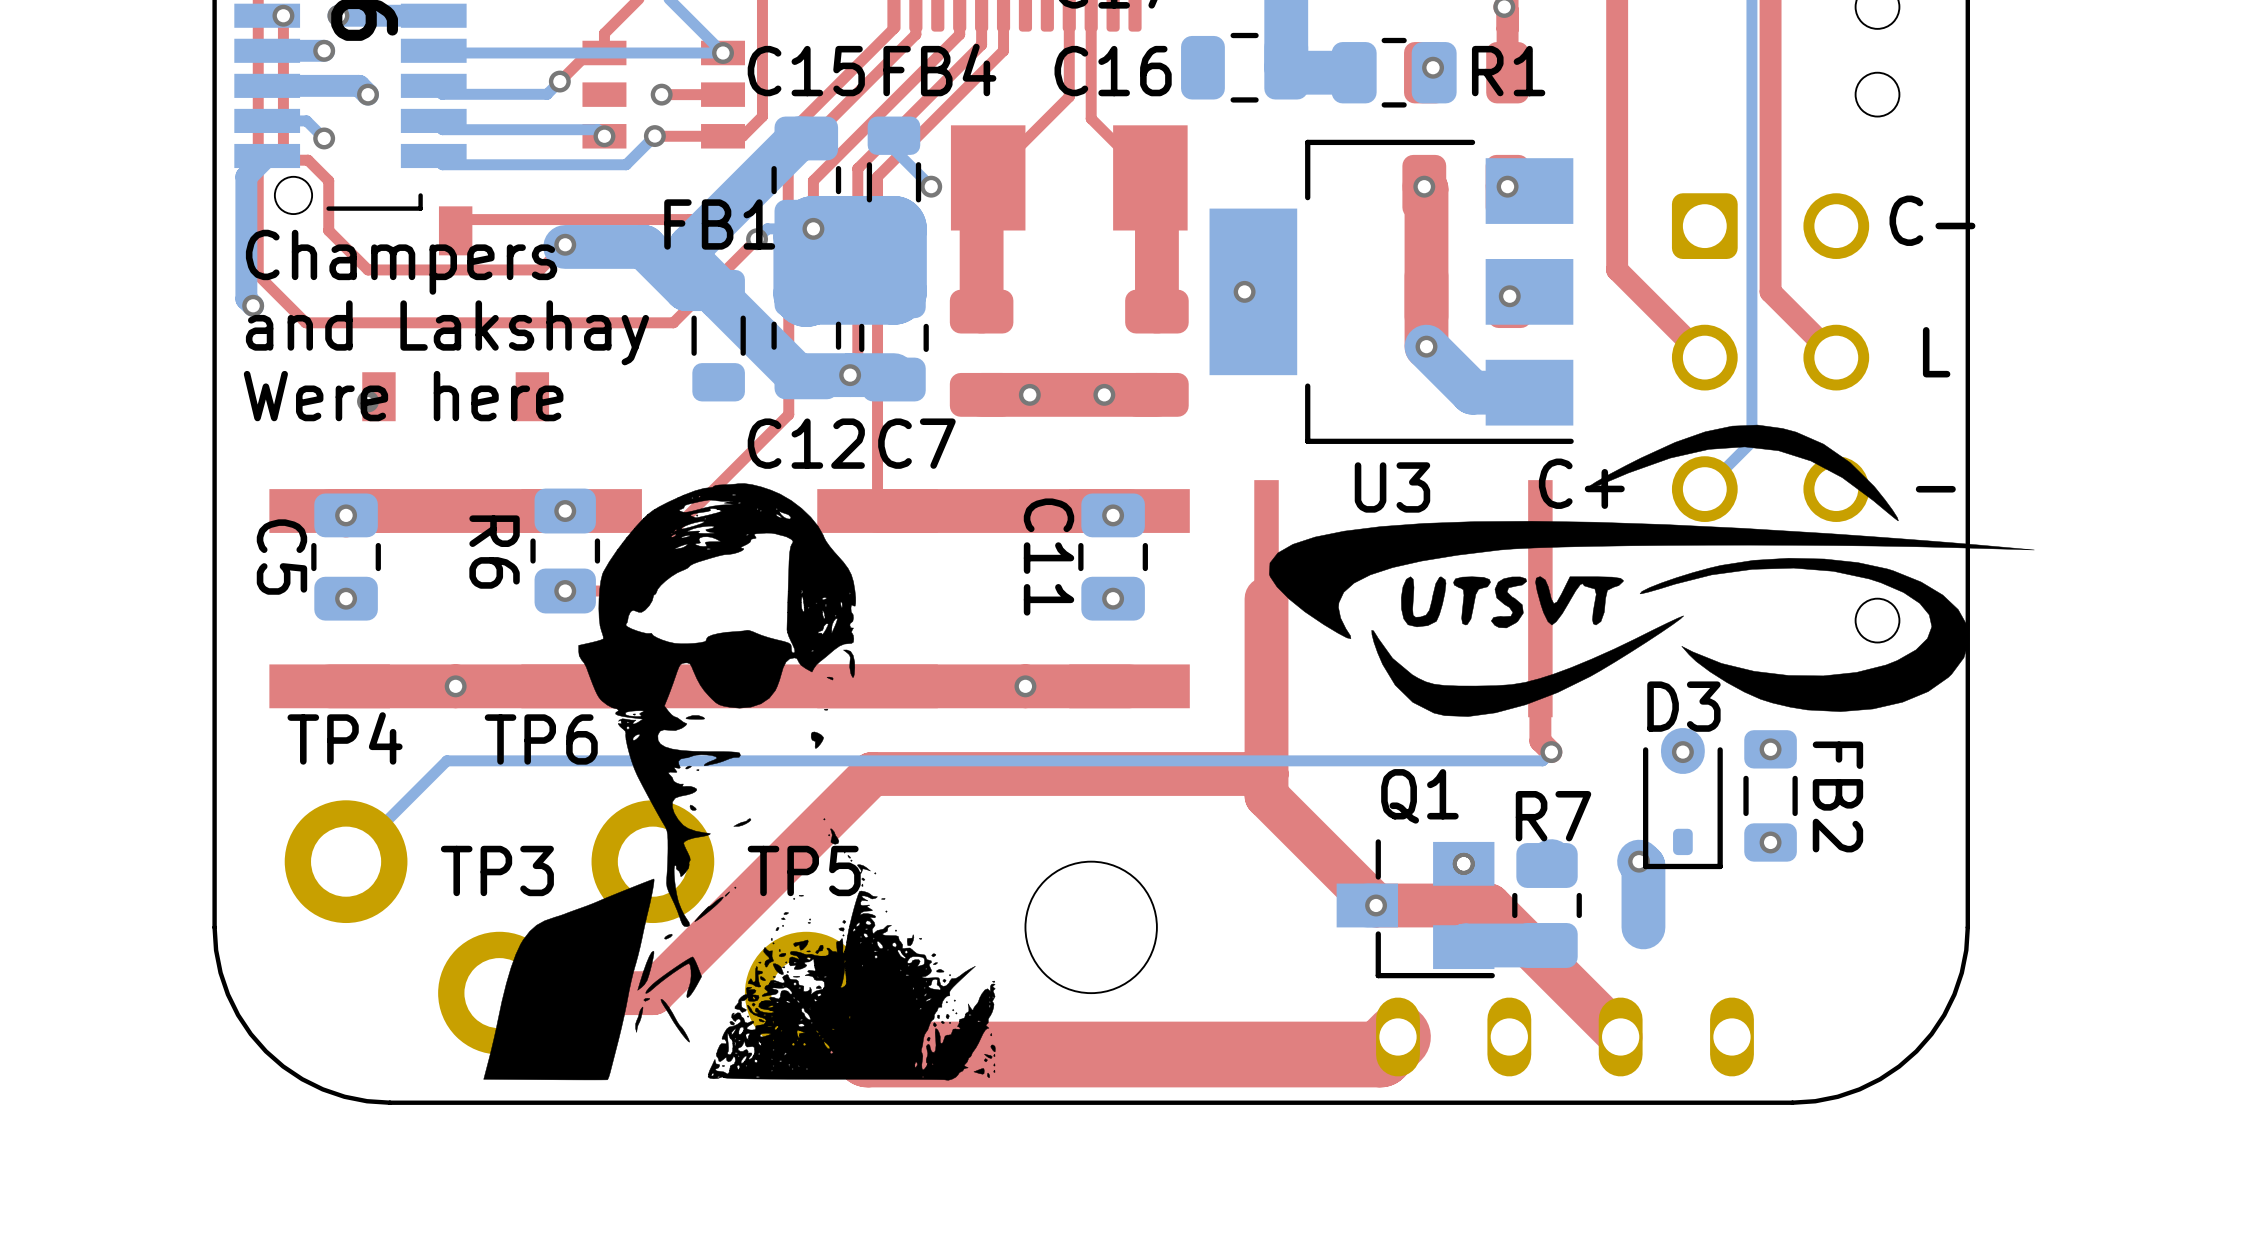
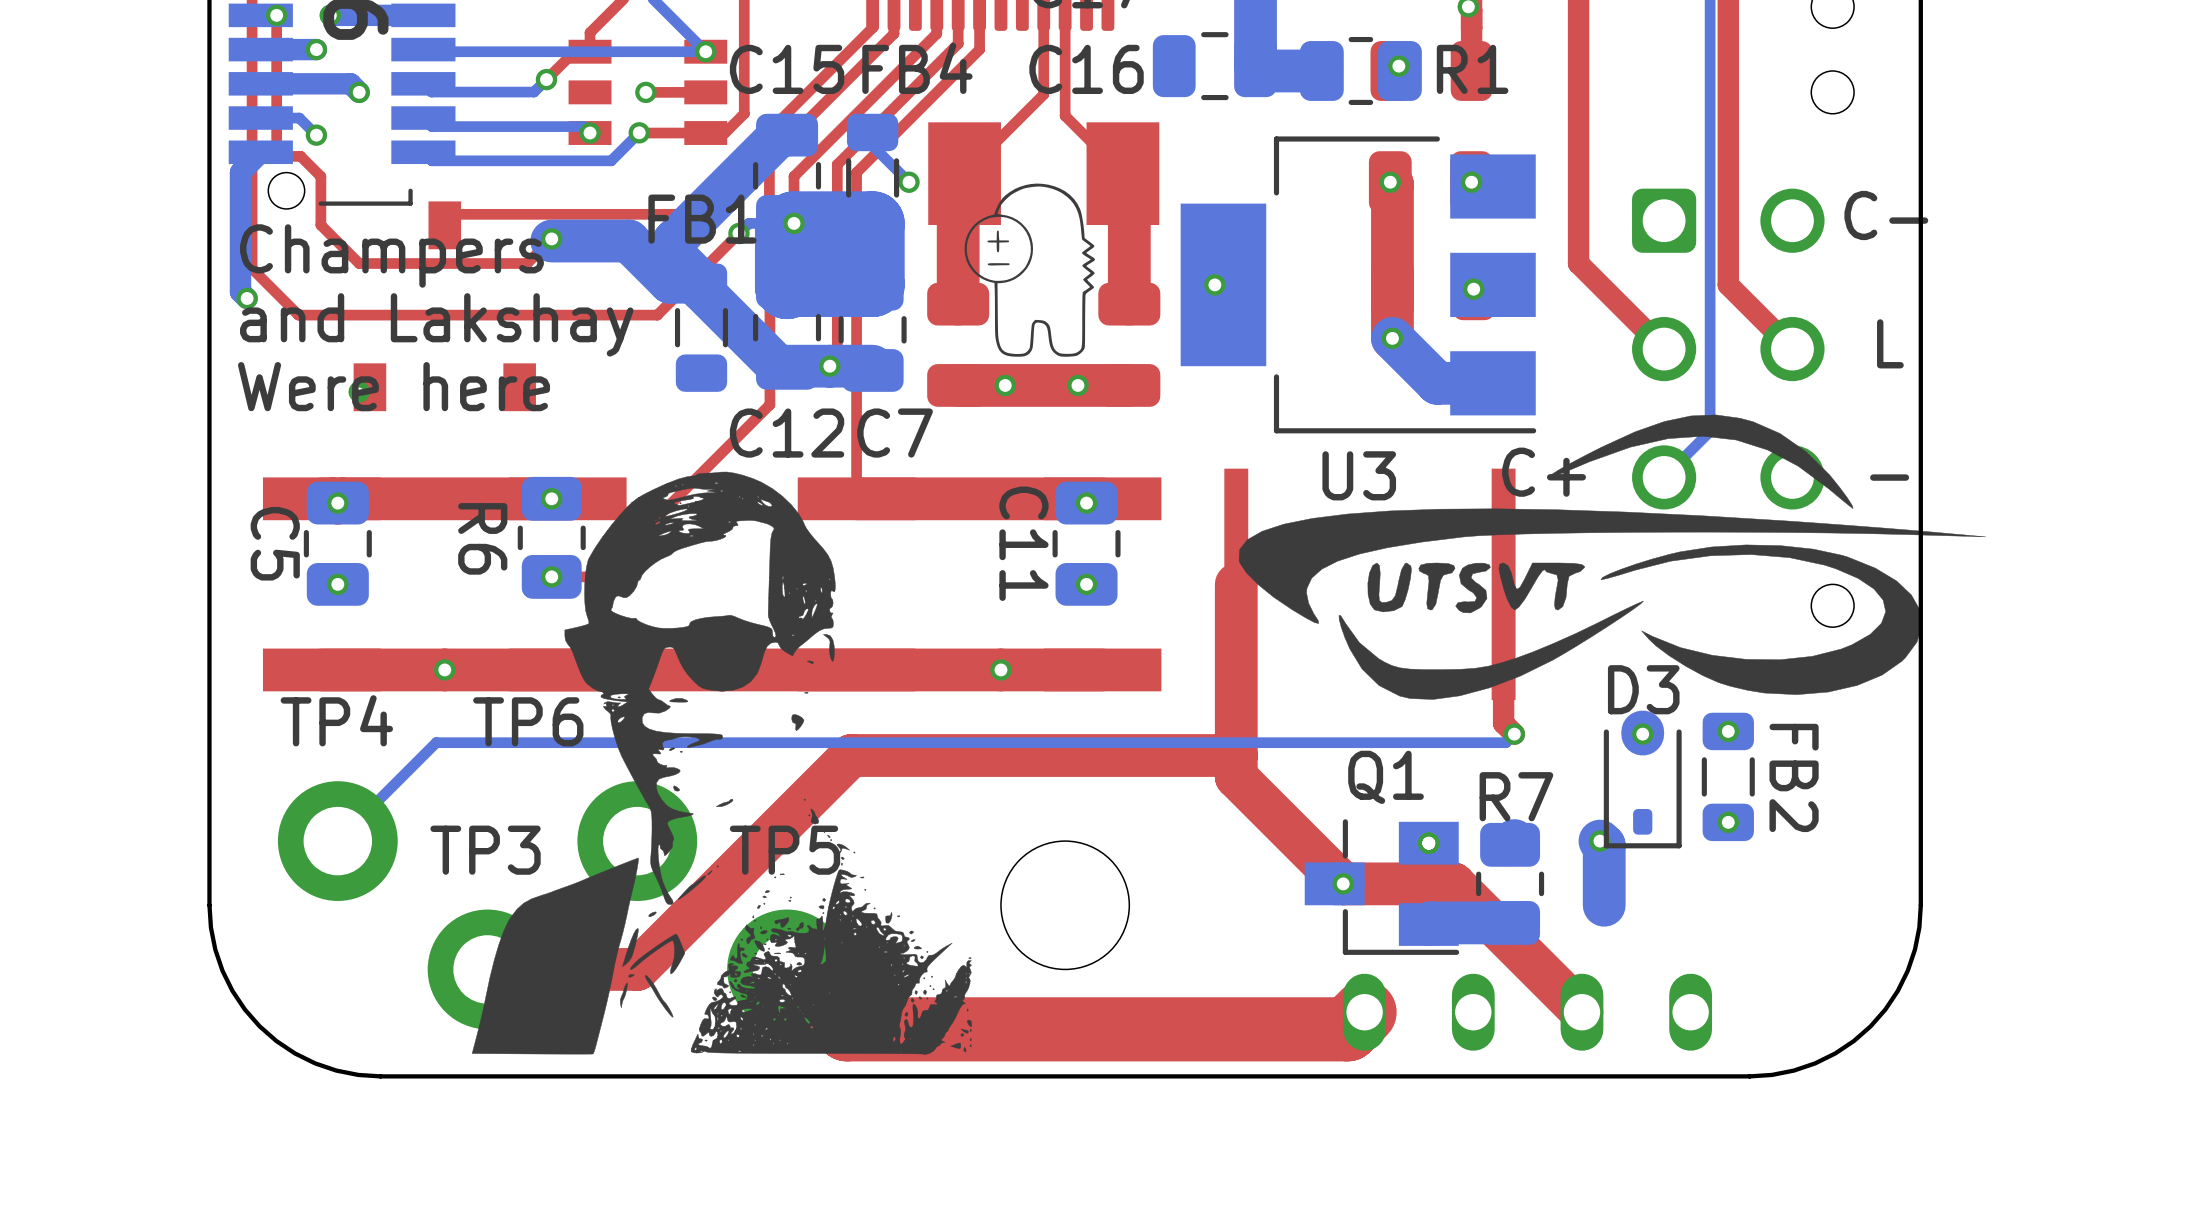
drawing: none -> [964, 183, 1095, 357]

